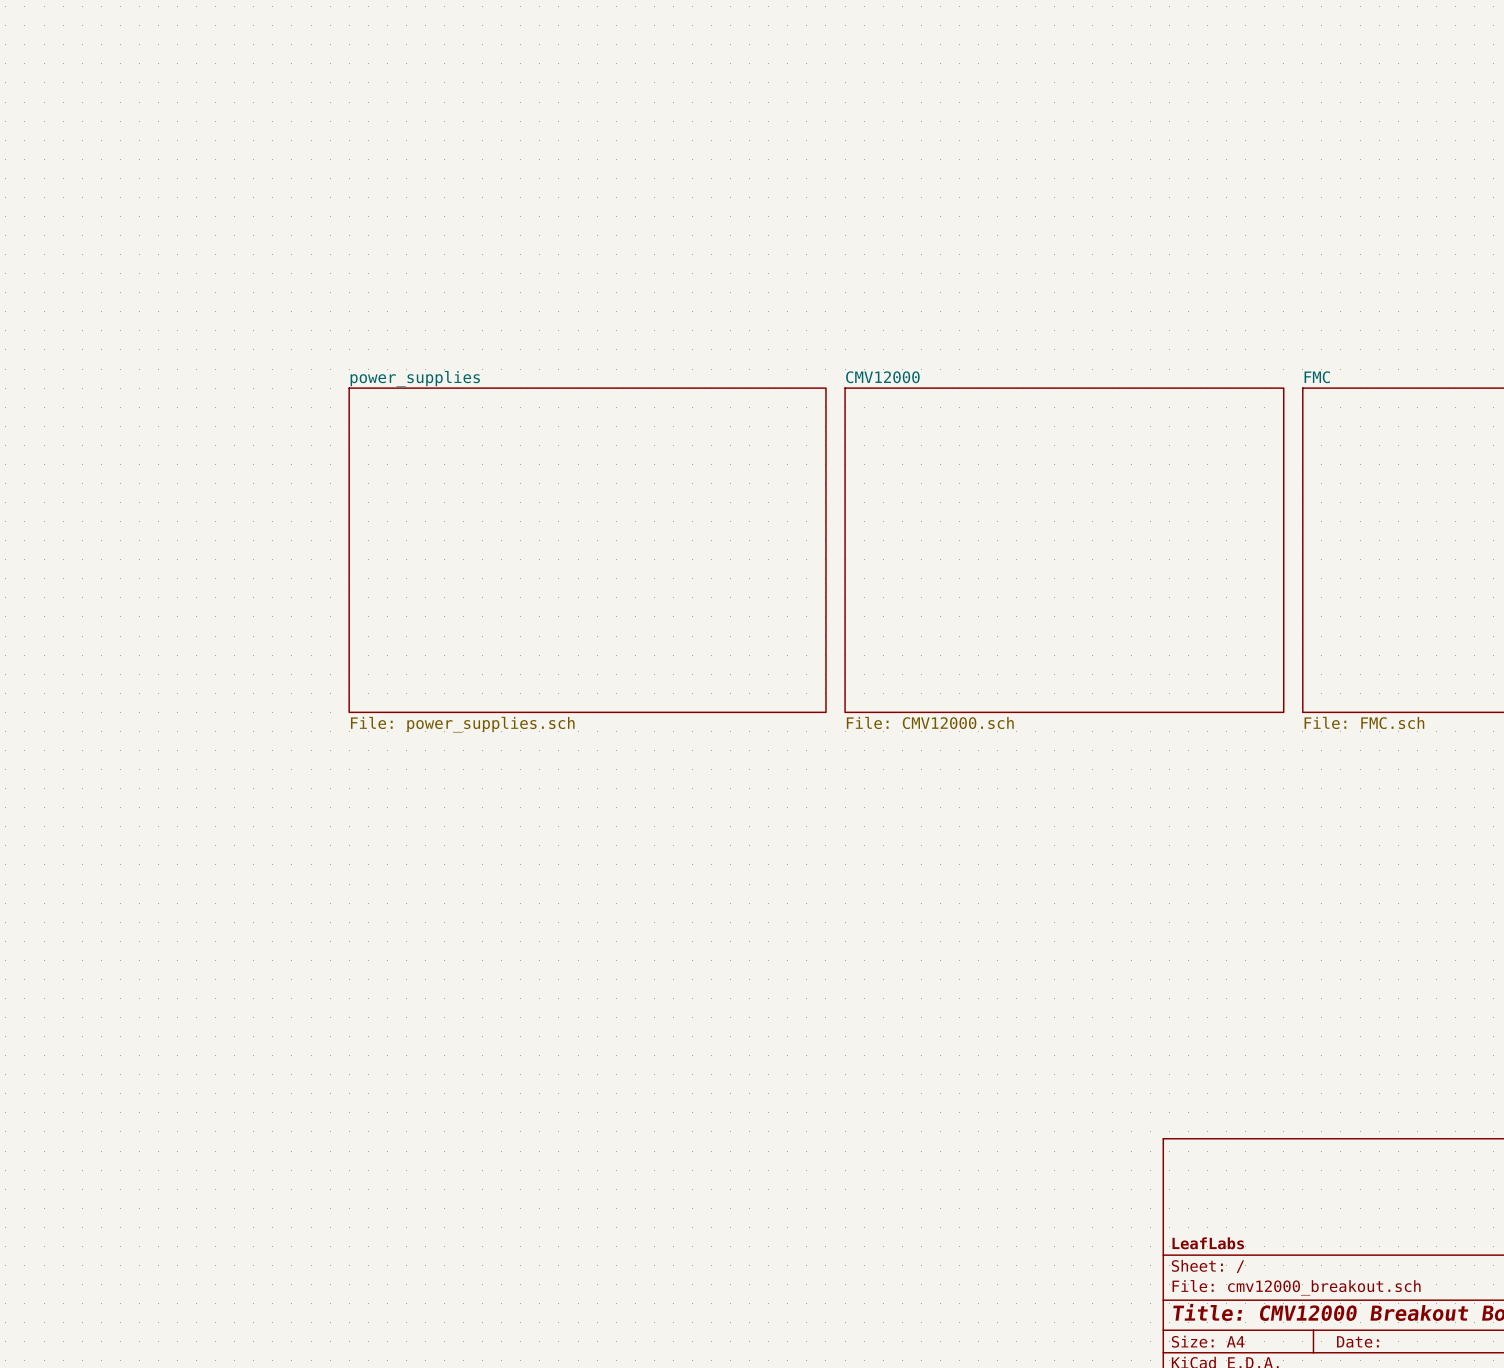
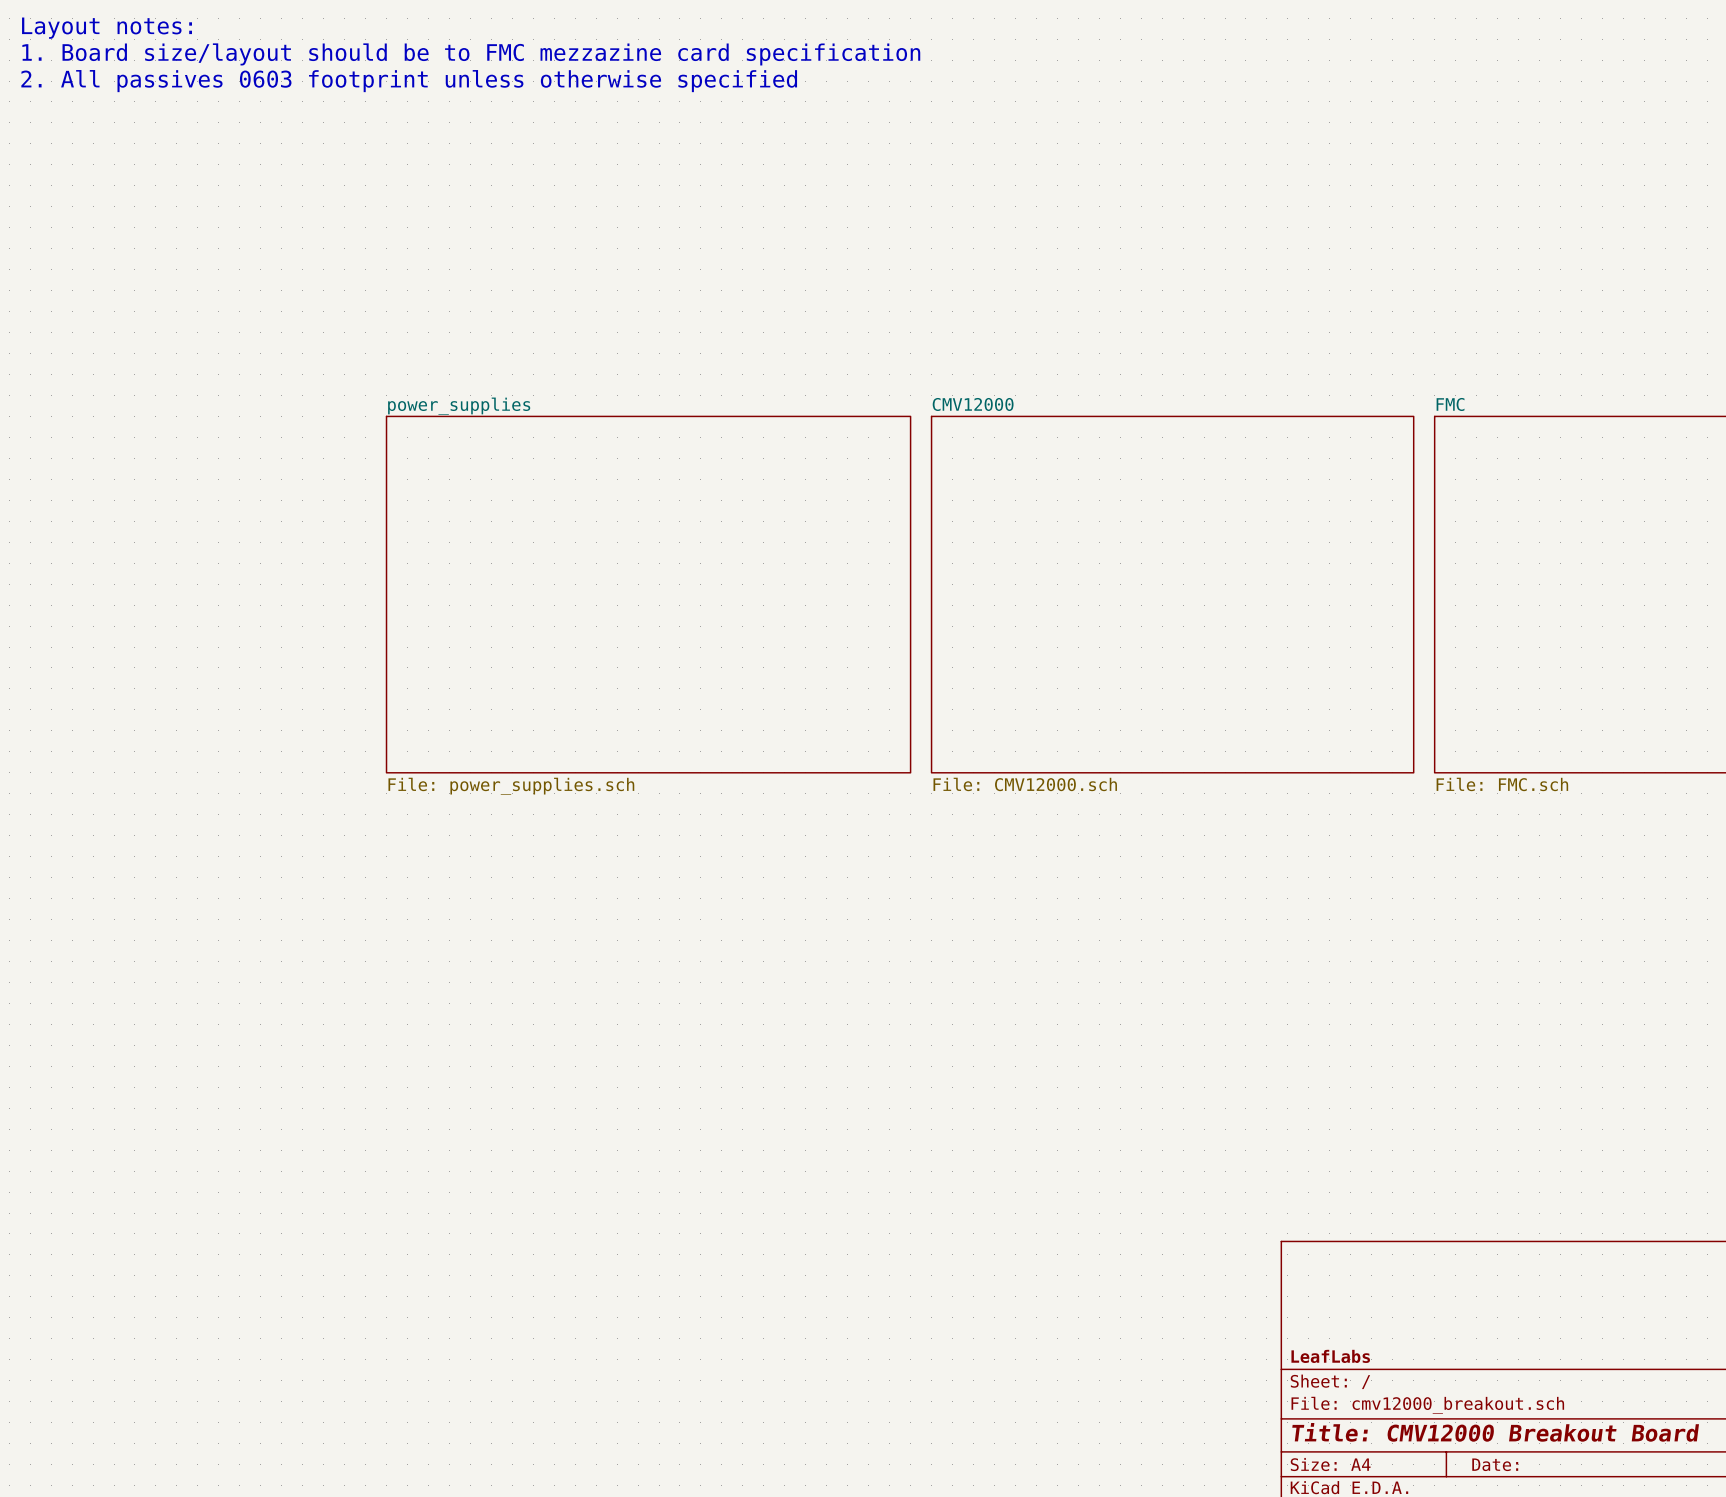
text: none -> Layout notes: (107, 28)
text: none -> 1. Board size/layout should be to FMC mezzazine card specification (471, 54)
text: none -> 2. All passives 0603 footprint unless otherwise specified (409, 81)

